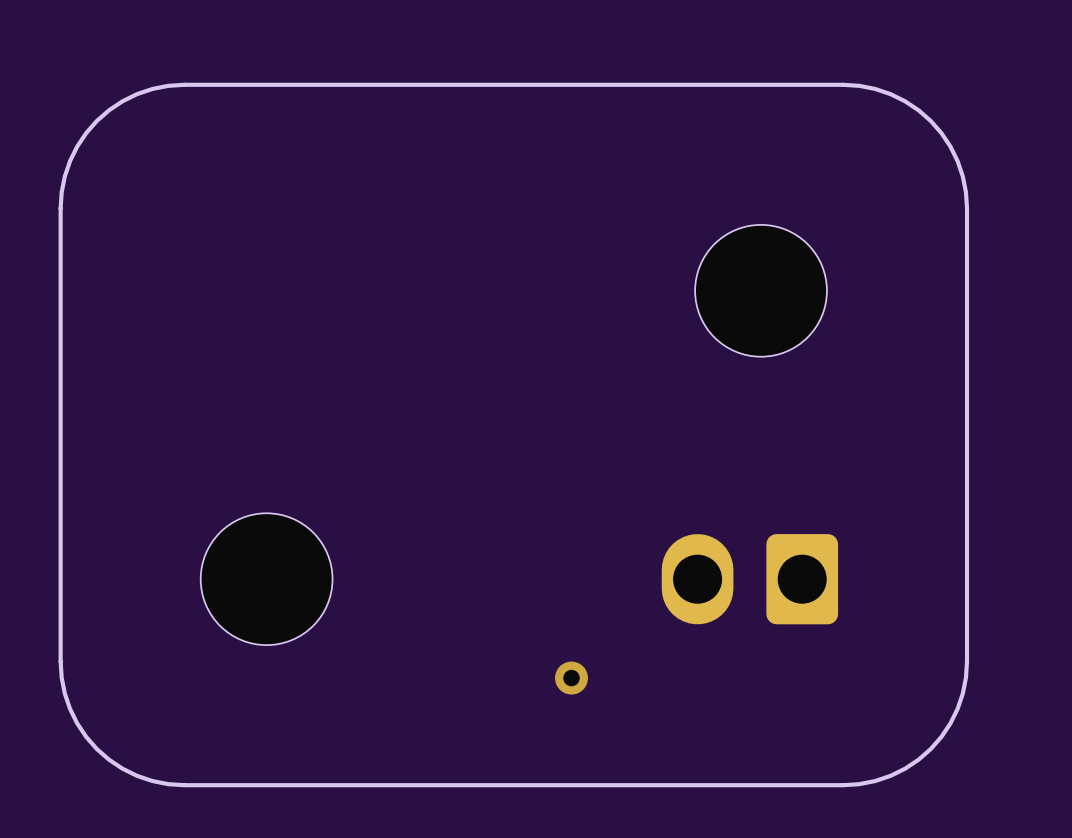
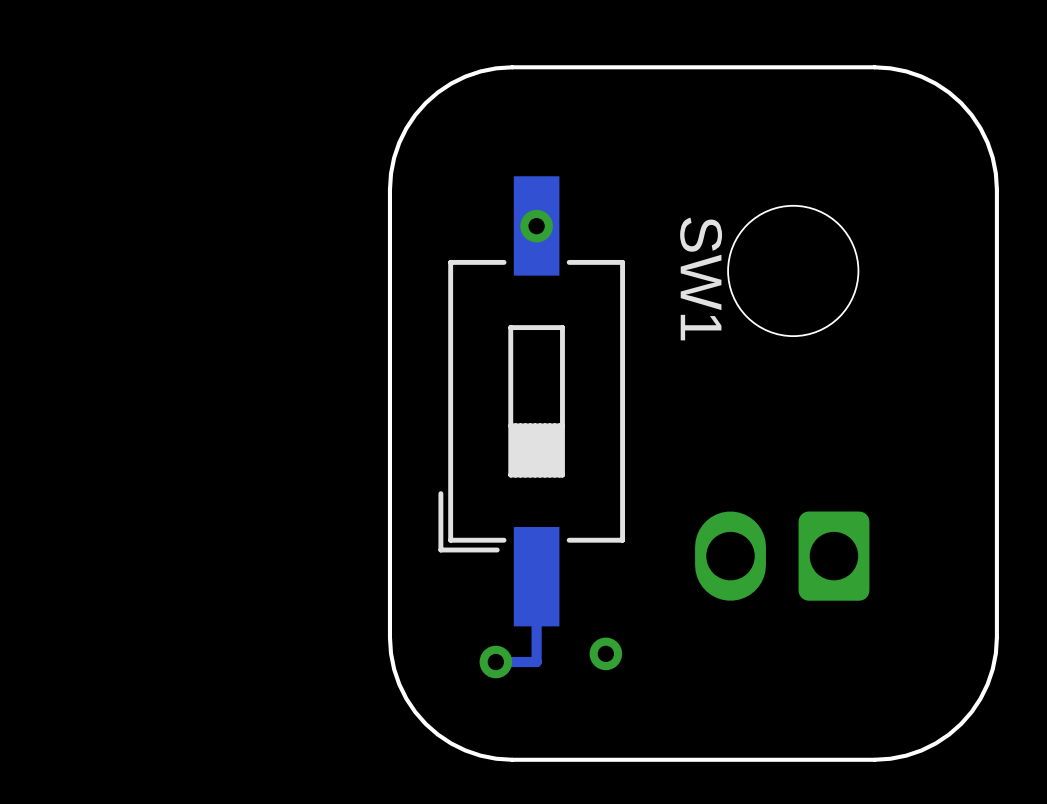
board edge: (476, 84) (184, 84) (152, 89) (136, 94) (108, 110) (86, 133) (70, 161) (64, 176) (60, 208) (60, 661) (64, 693) (77, 723) (86, 736) (96, 748) (122, 768) (136, 775) (168, 784) (476, 785) -> (512, 67) (480, 71) (465, 76) (437, 92) (425, 103) (415, 115) (399, 142) (394, 157) (389, 189) (389, 637) (394, 669) (406, 698) (425, 723) (437, 734) (465, 750) (480, 755) (512, 759)
via: none -> (536, 226)
SW1: none -> (531, 401)
part: (266, 579) -> none
track: none -> (536, 576) (536, 662) (495, 662)
via: none -> (495, 662)

